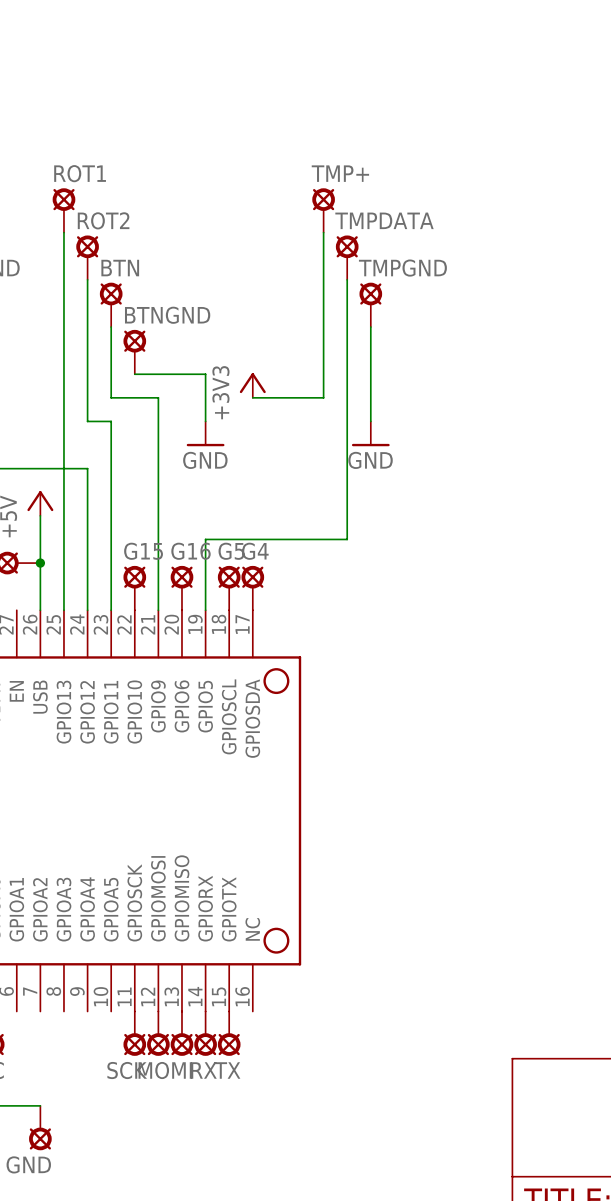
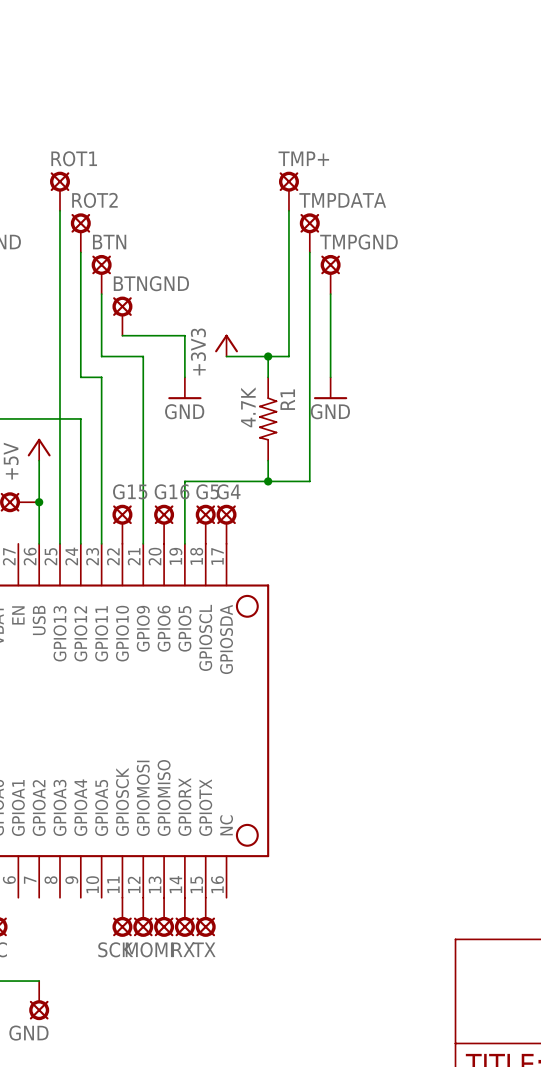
wire: none -> (268, 356) (268, 377)
junction: none -> (268, 356)
R1: none -> 4.7K (268, 418)
wire: none -> (268, 460) (268, 481)
junction: none -> (268, 481)

